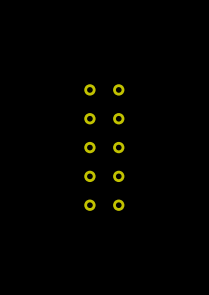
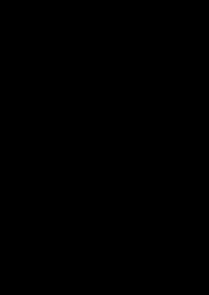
part: (104, 147) -> none

